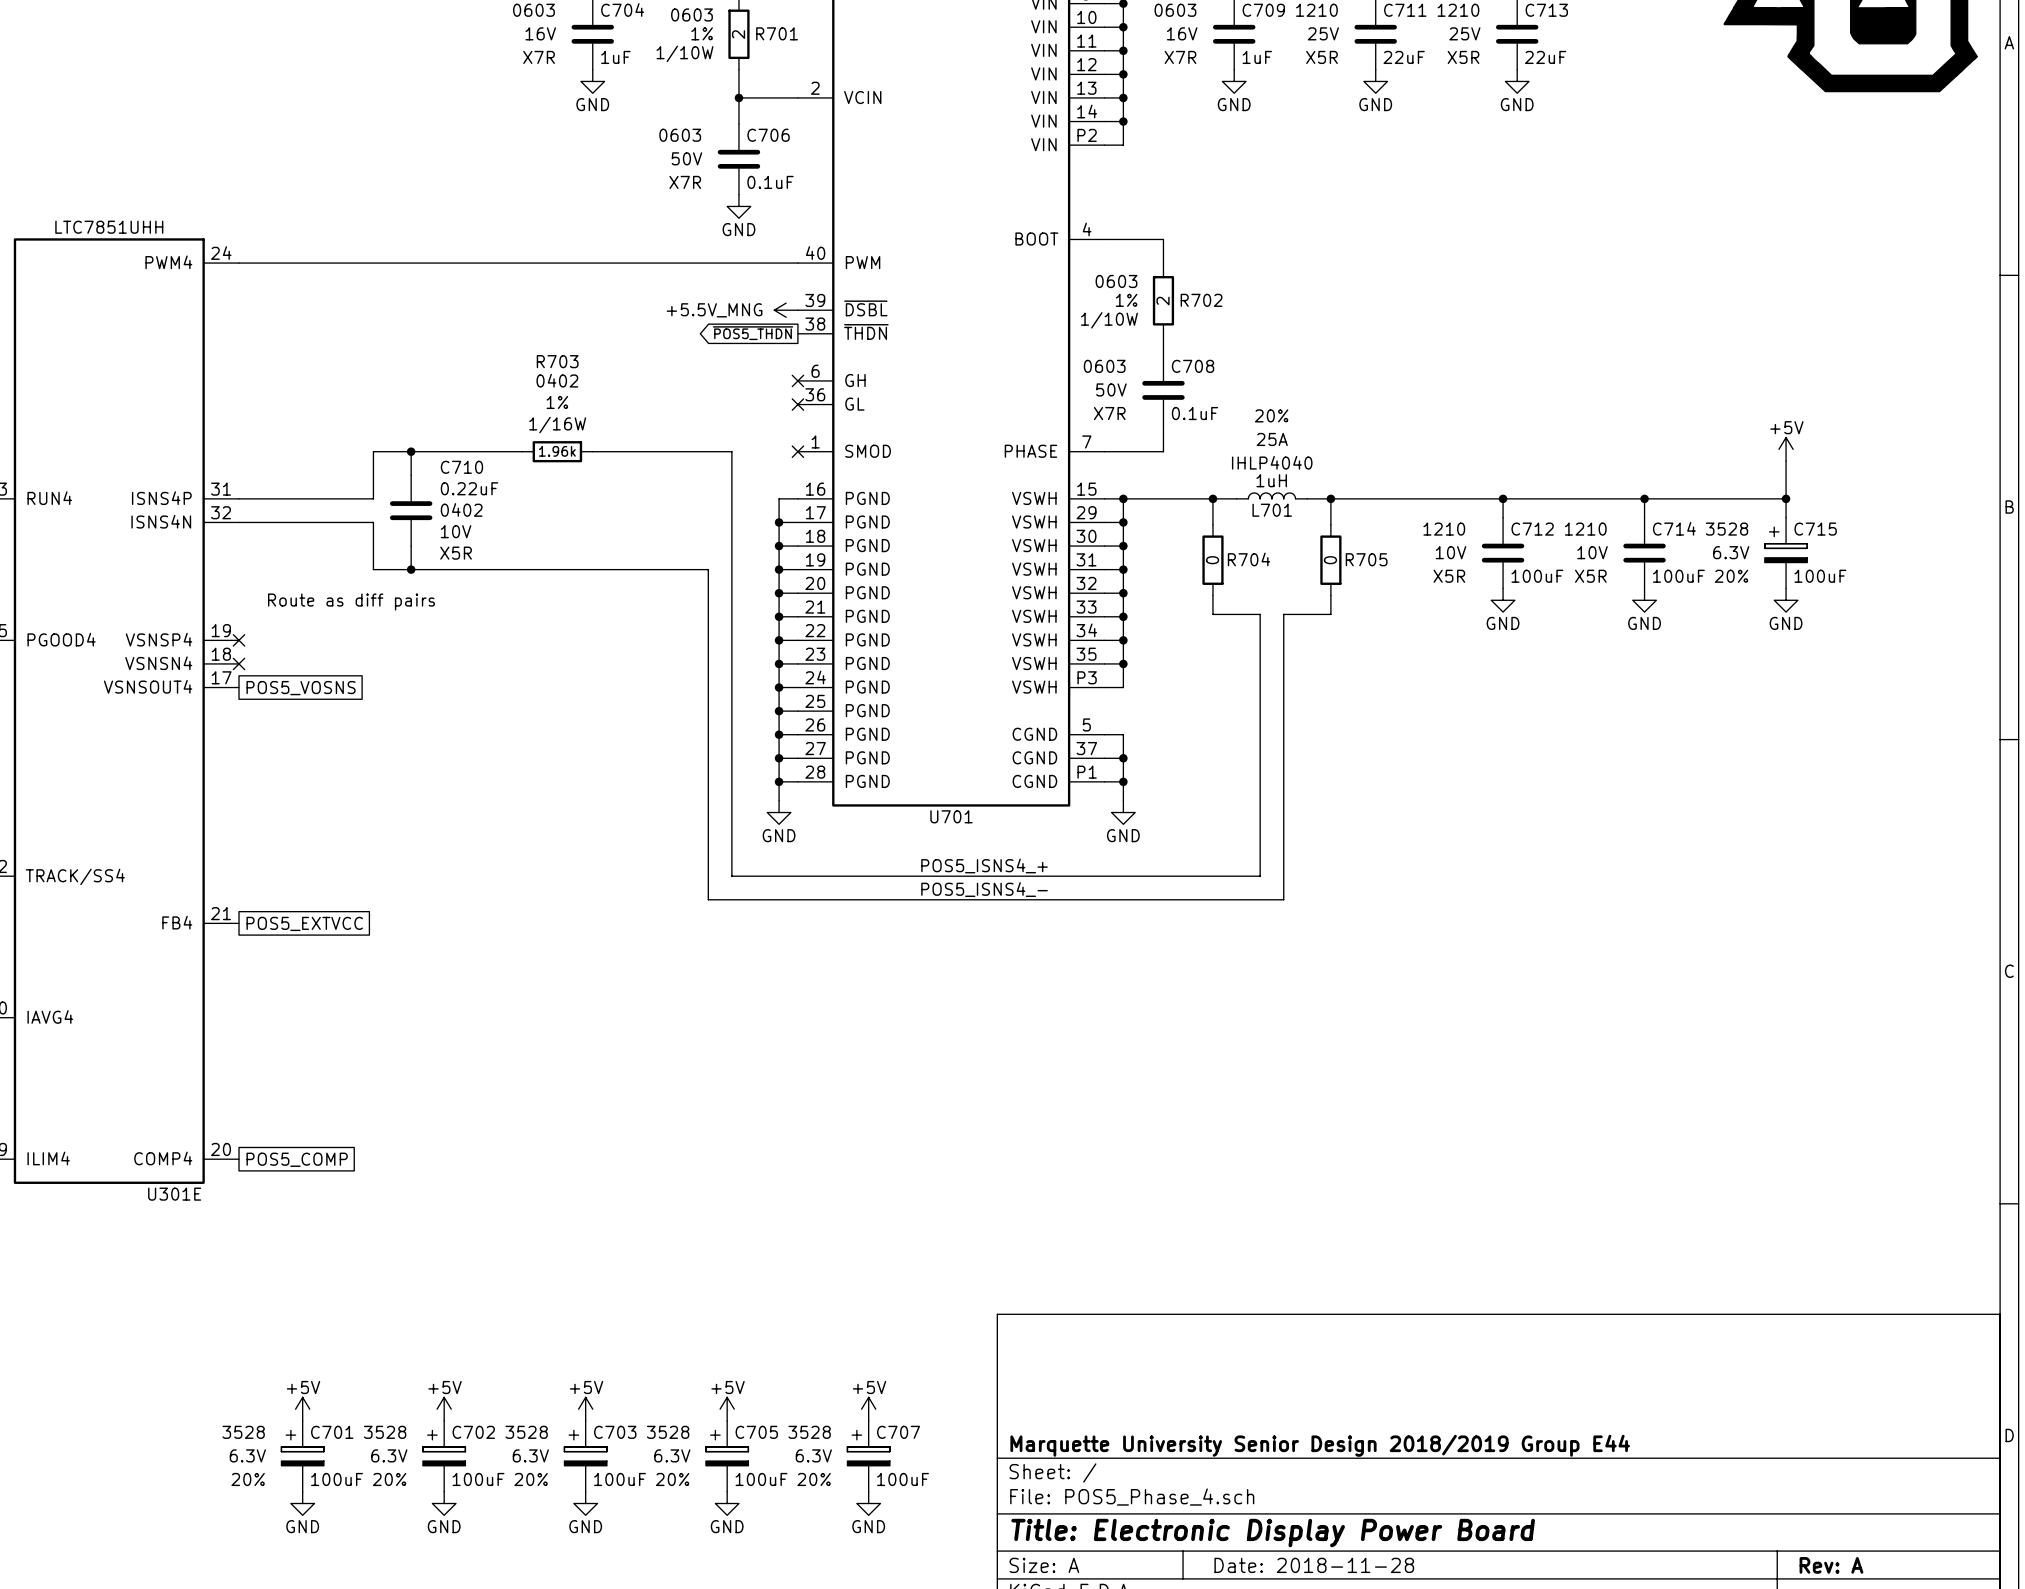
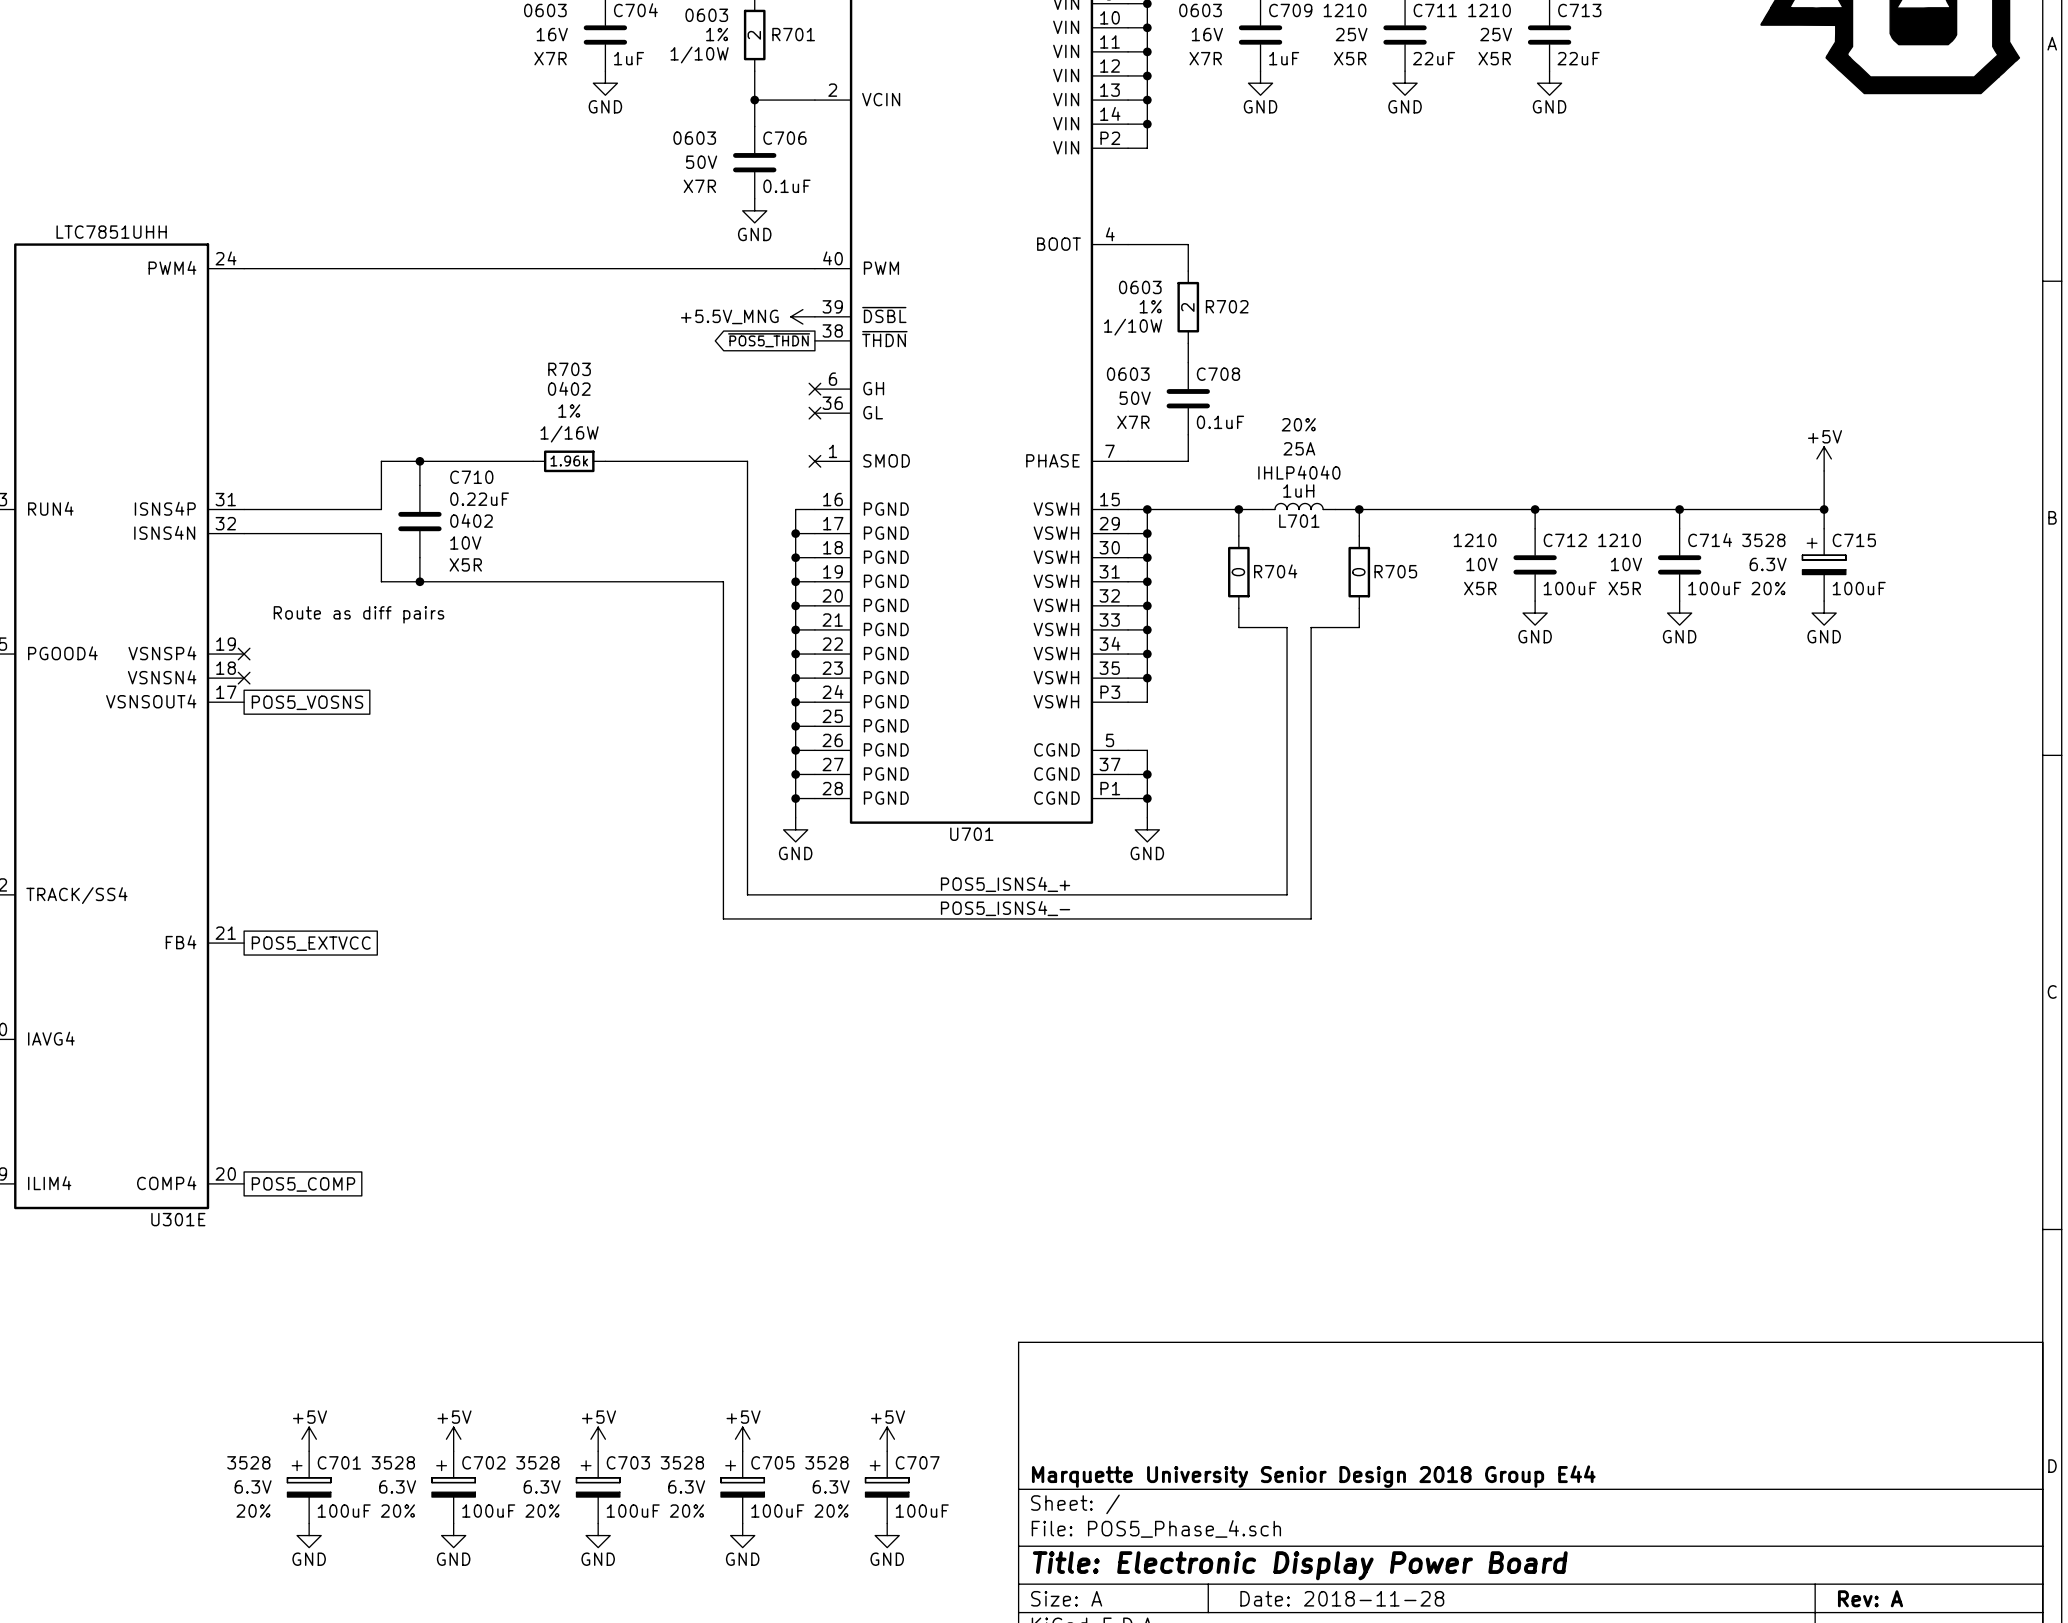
title block: Marquette University Senior Design 2018/2019 Group E44 (1320, 1445) -> Marquette University Senior Design 2018 Group E44 (1313, 1476)

